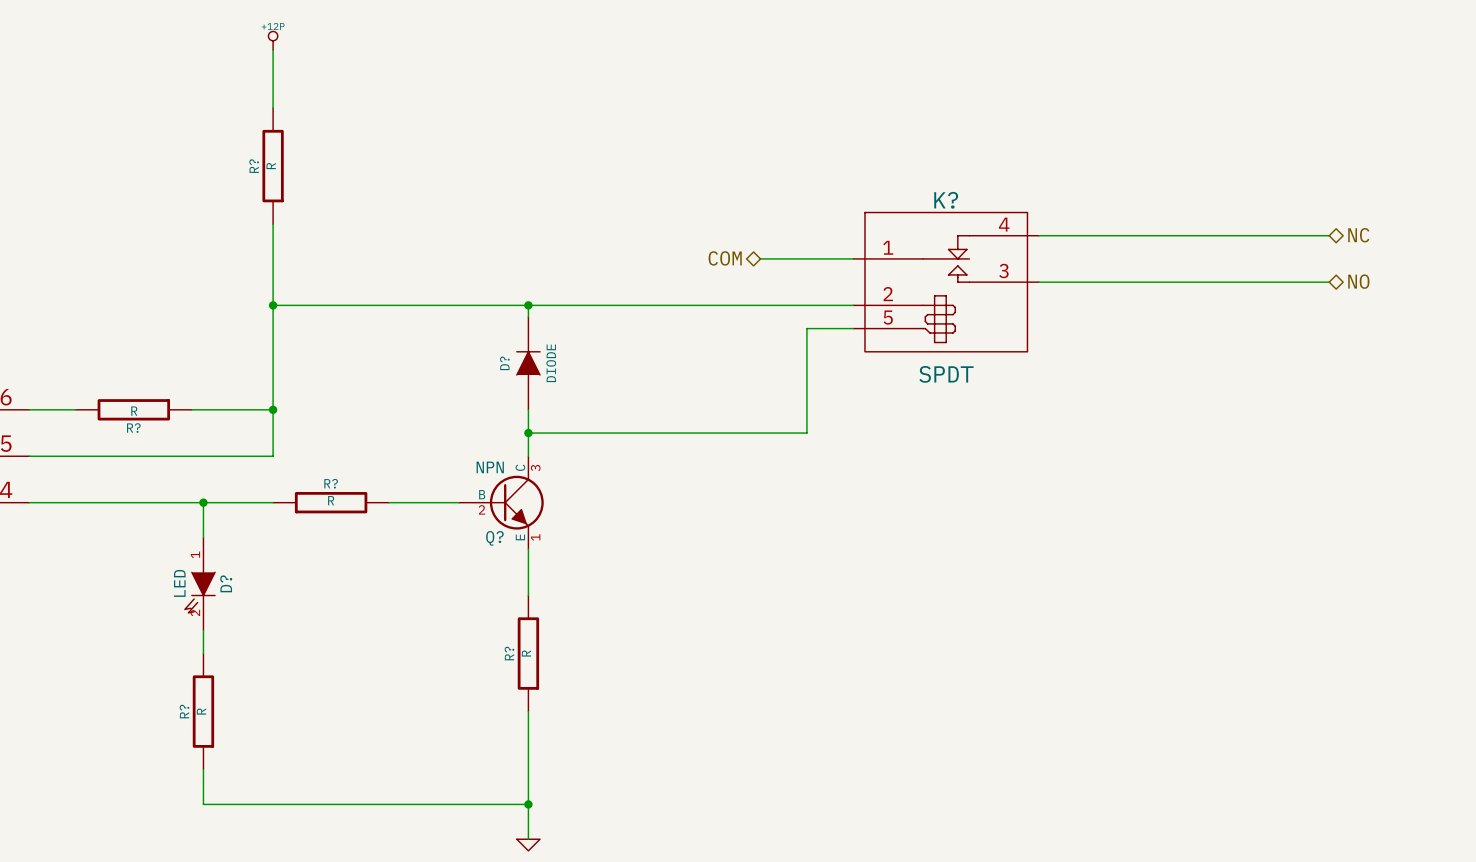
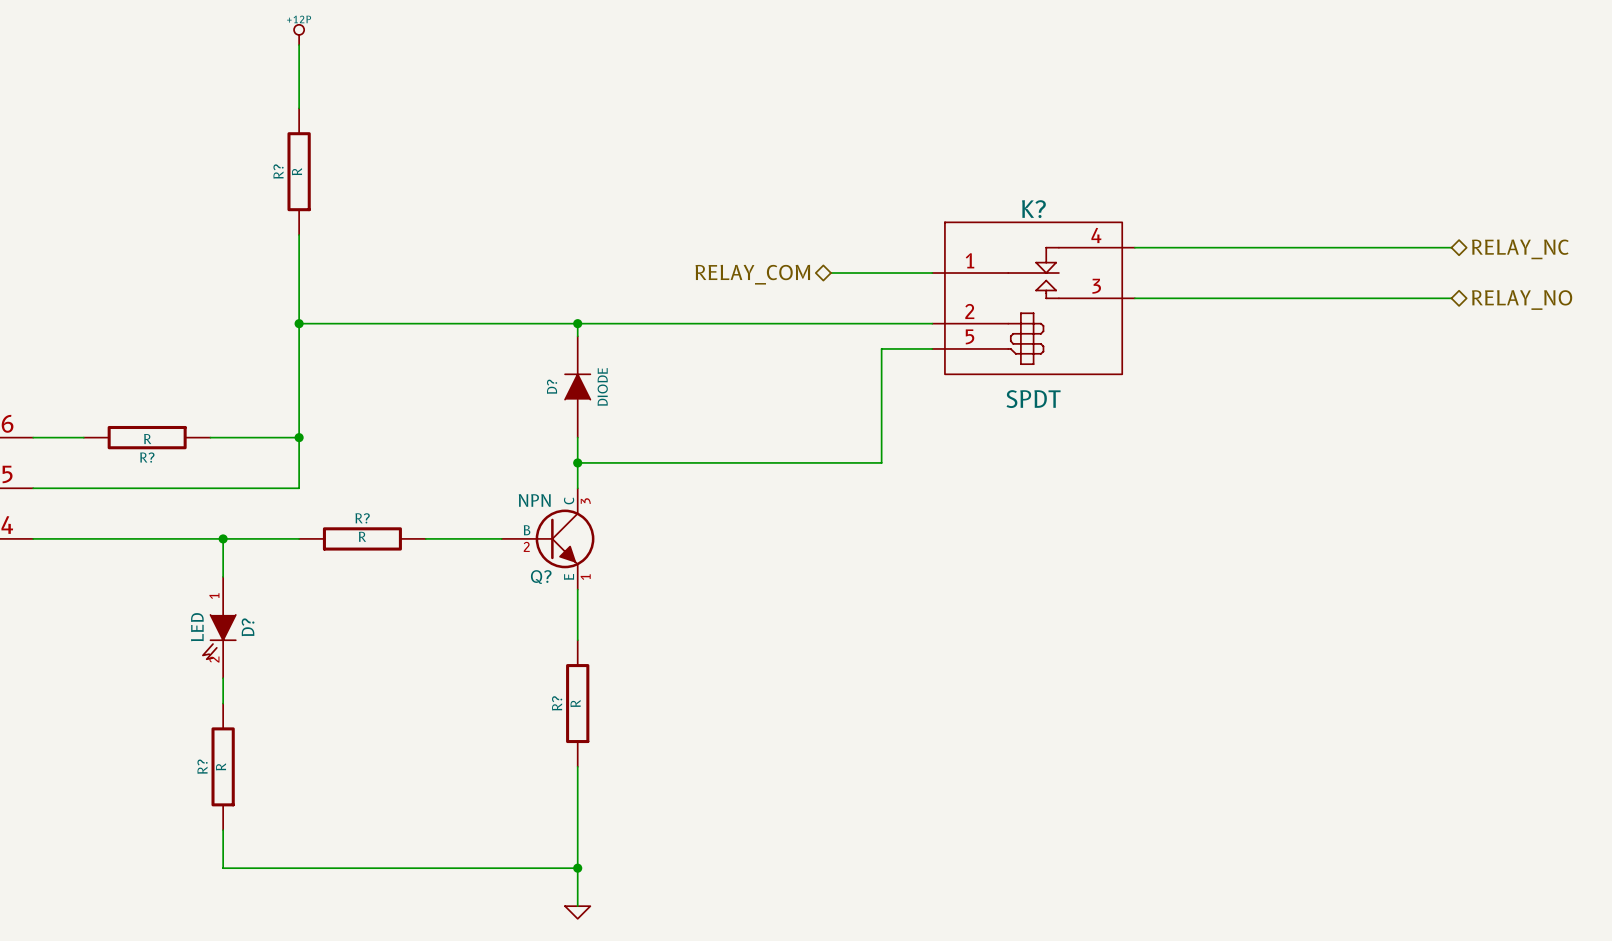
hierarchical label: NC (1358, 235) -> RELAY_NC (1520, 249)
hierarchical label: COM (725, 258) -> RELAY_COM (752, 274)
hierarchical label: NO (1358, 281) -> RELAY_NO (1522, 300)

